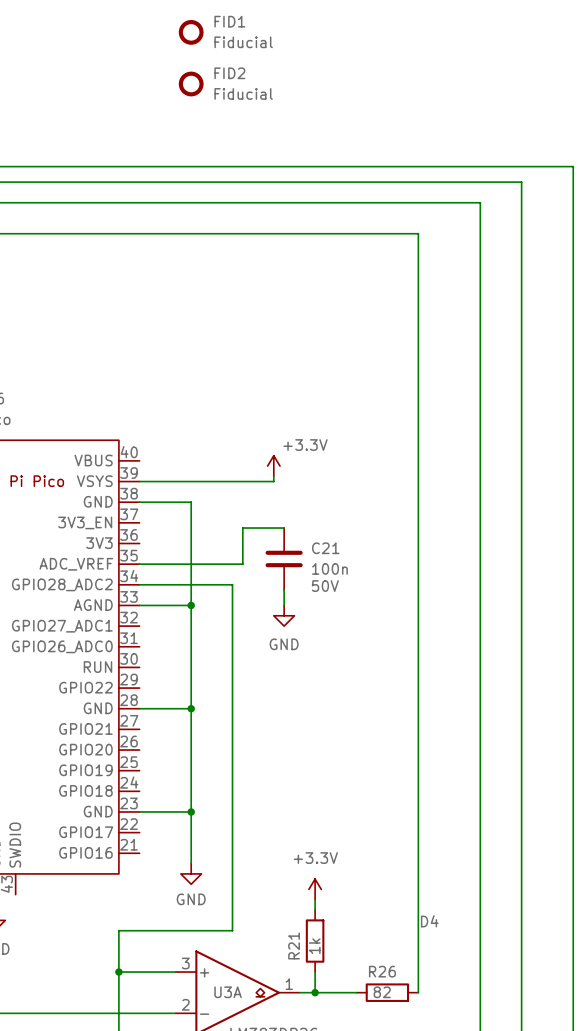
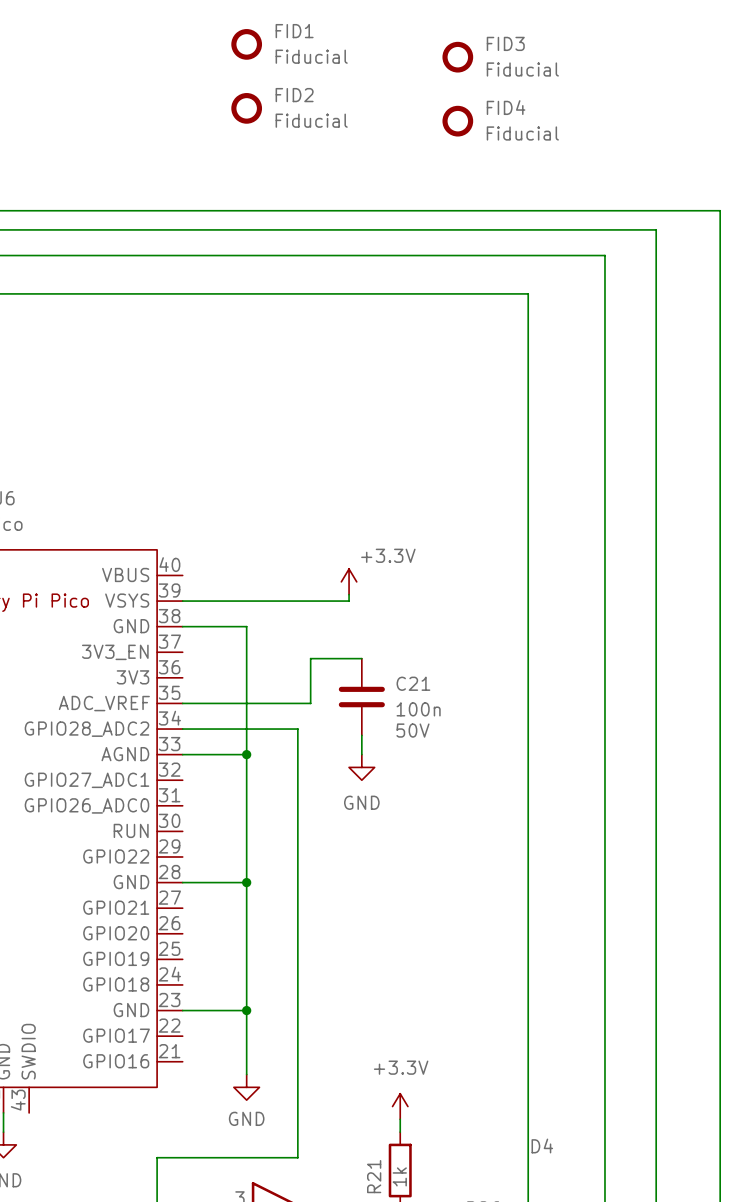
FID3: none -> Fiducial (457, 57)
FID4: none -> Fiducial (457, 121)

